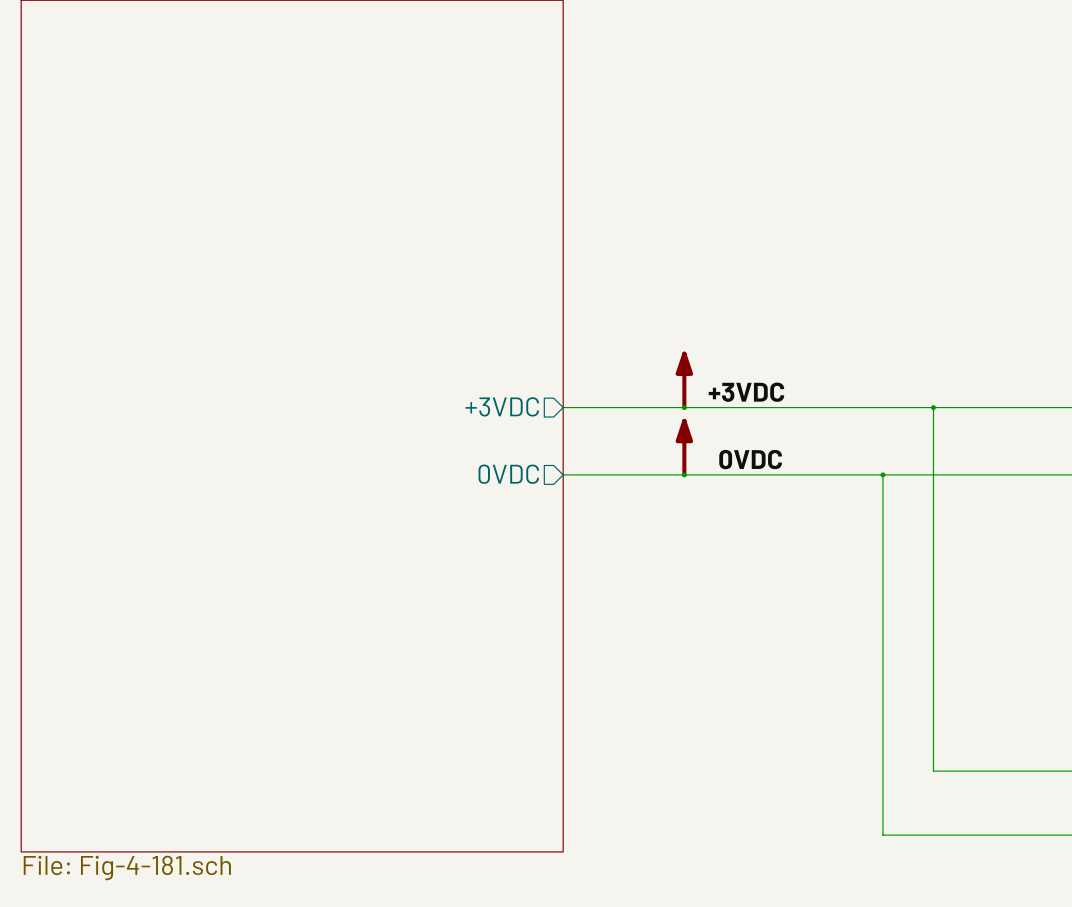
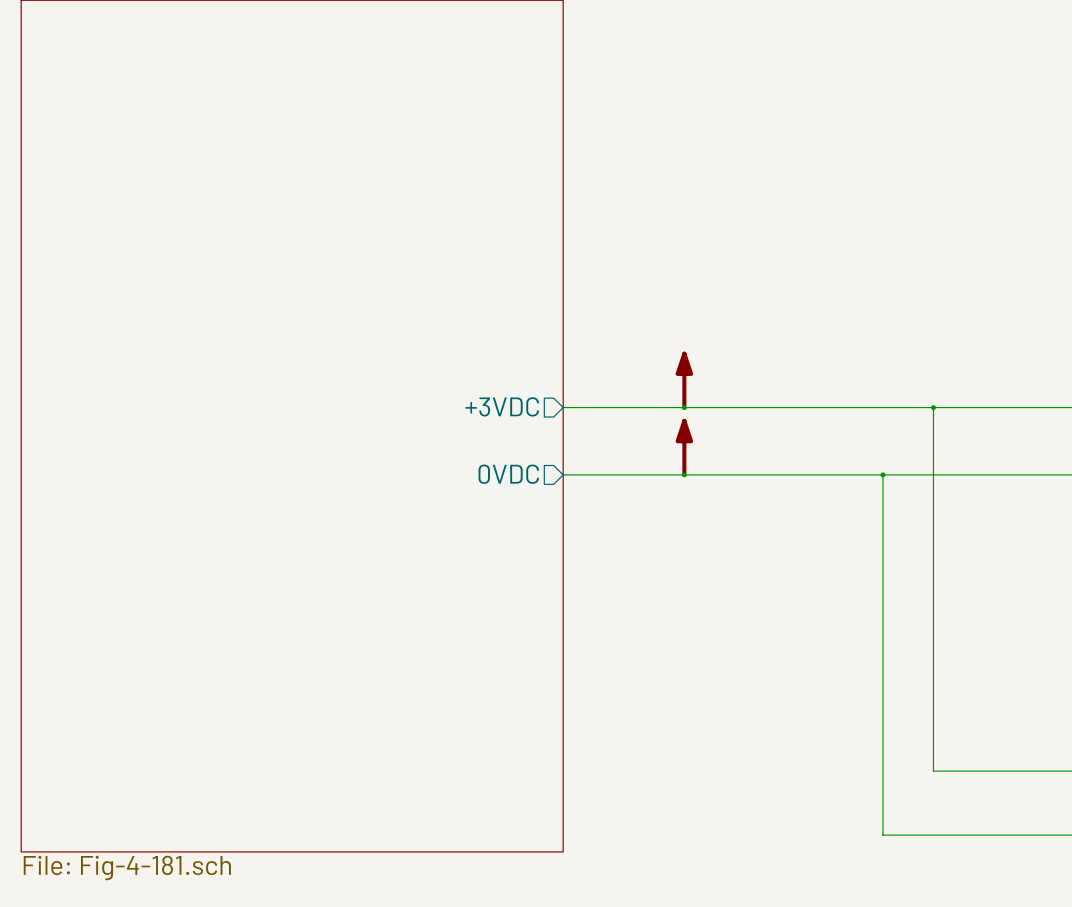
label: +3VDC (746, 392) -> none
label: 0VDC (750, 459) -> none

